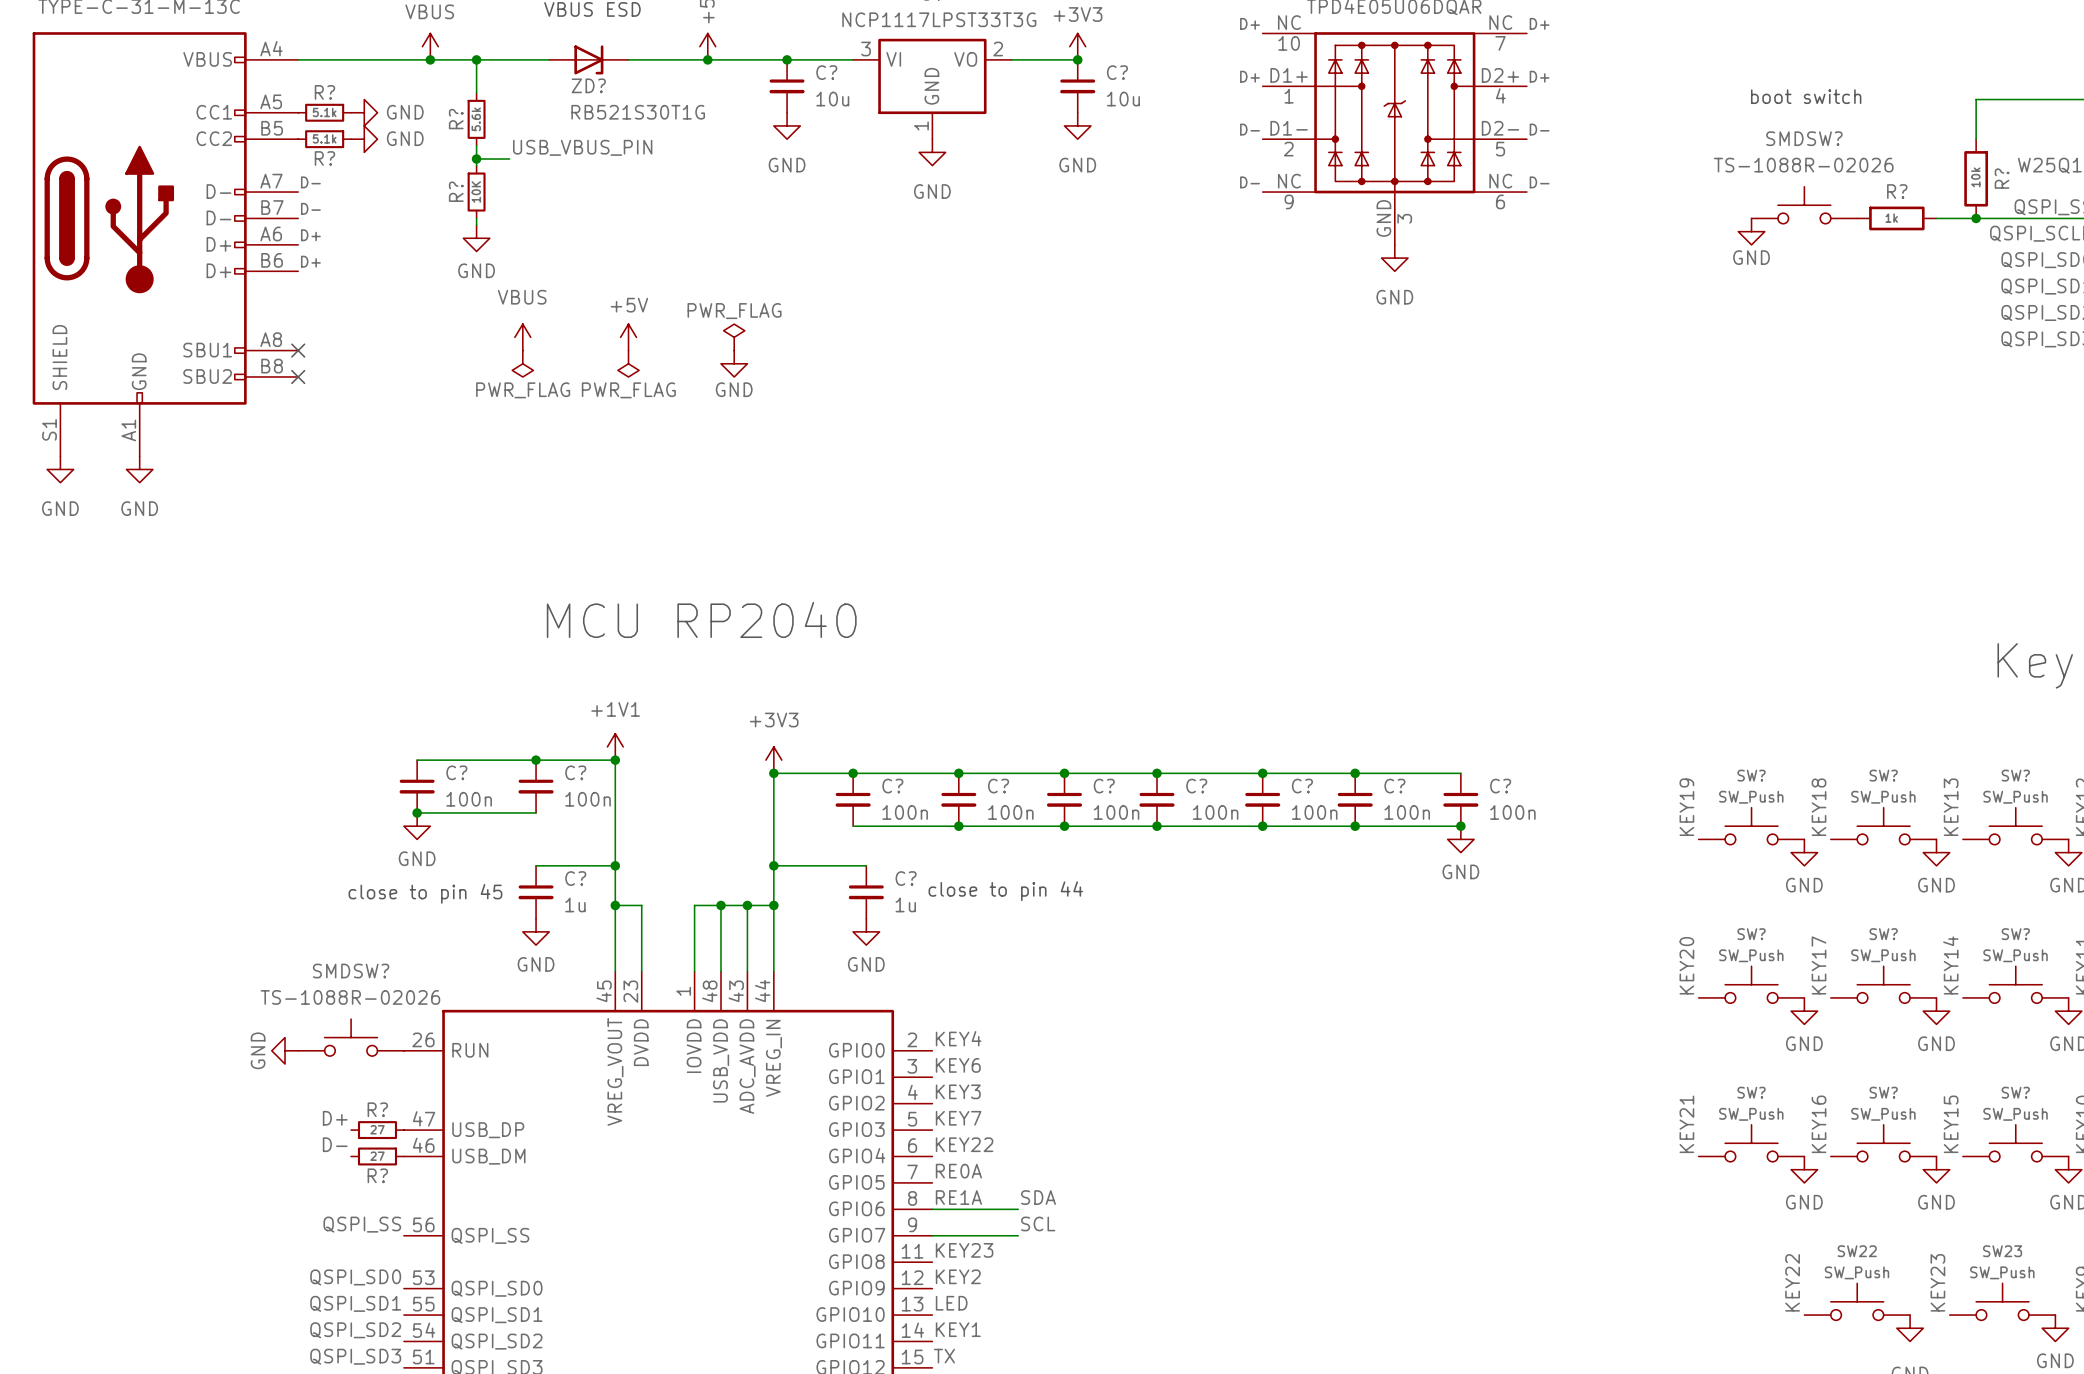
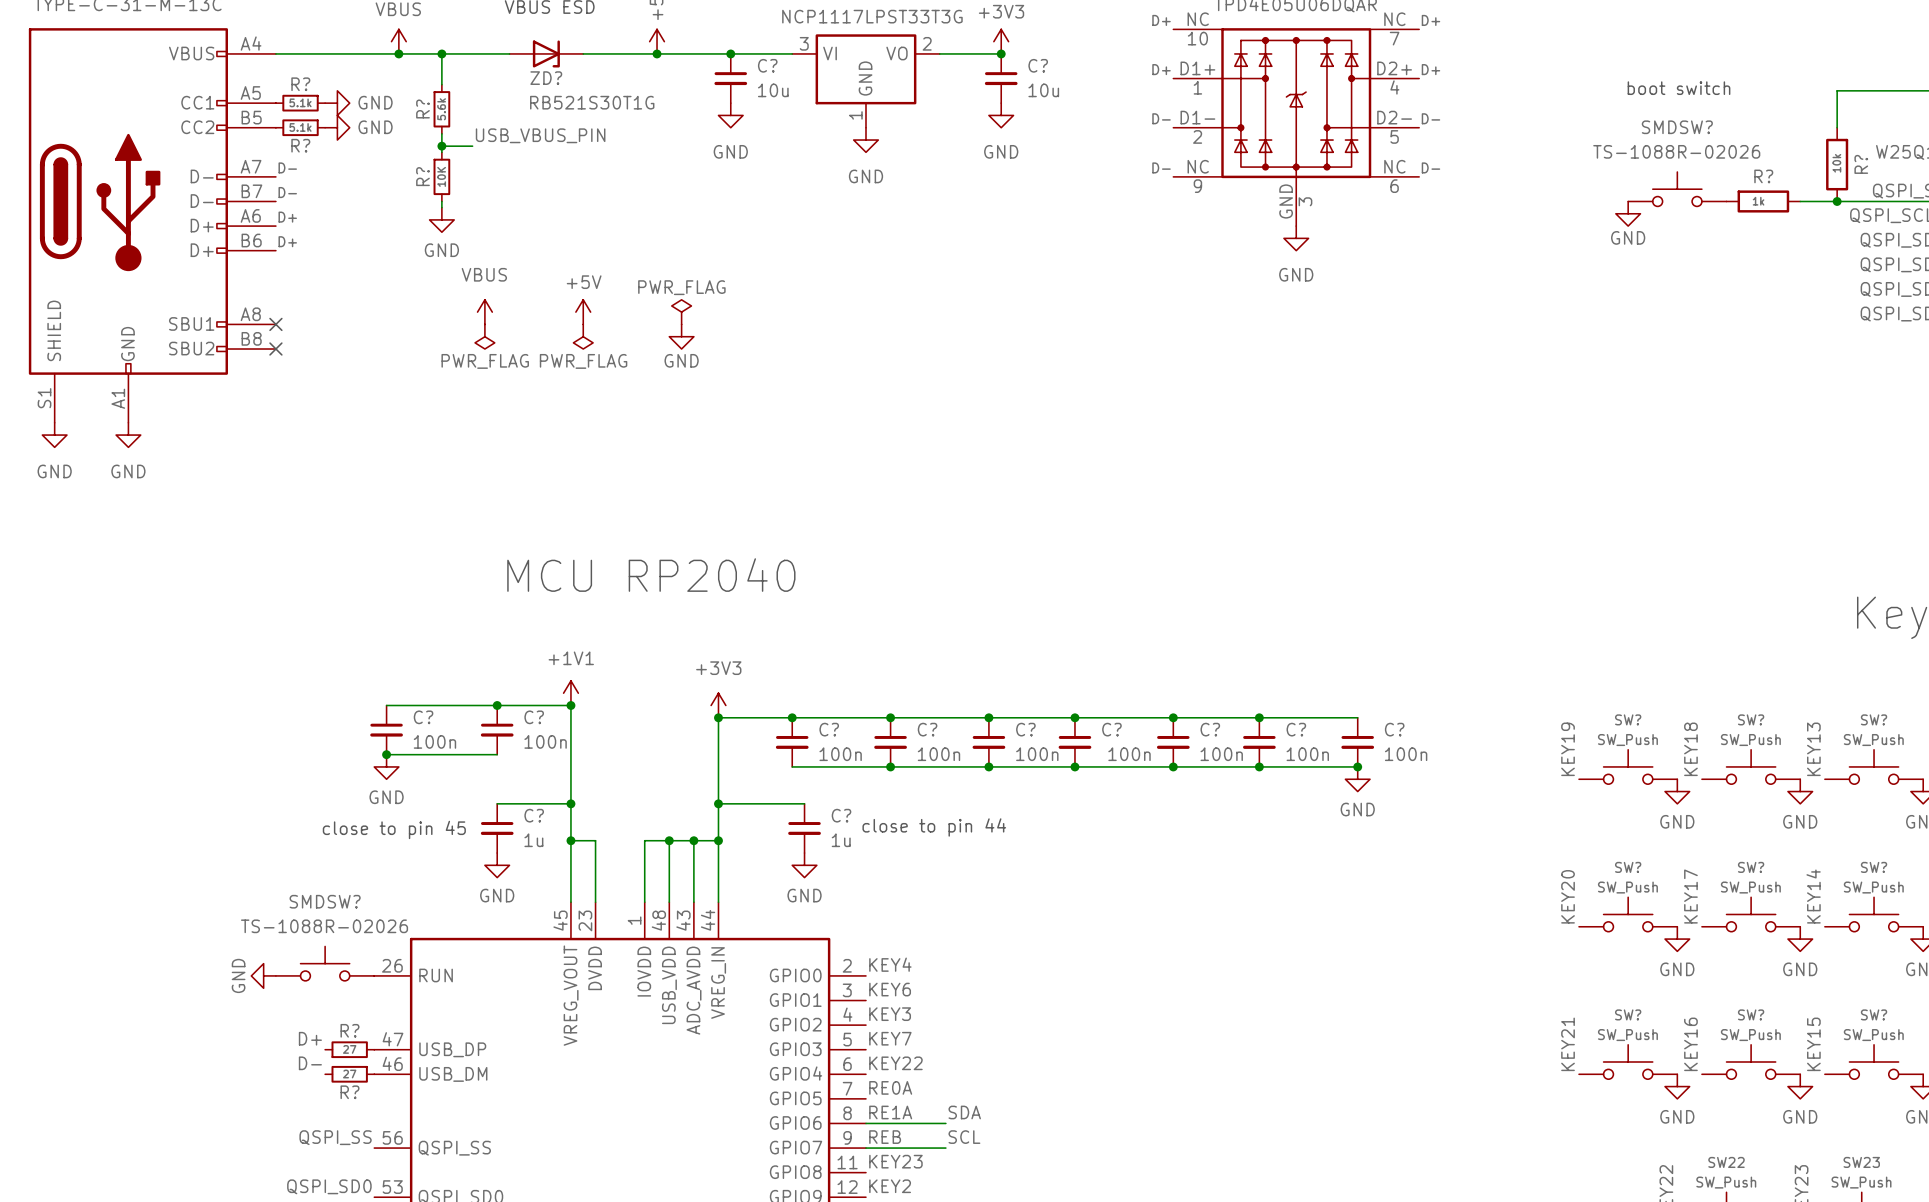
label: none -> REB (885, 1137)

